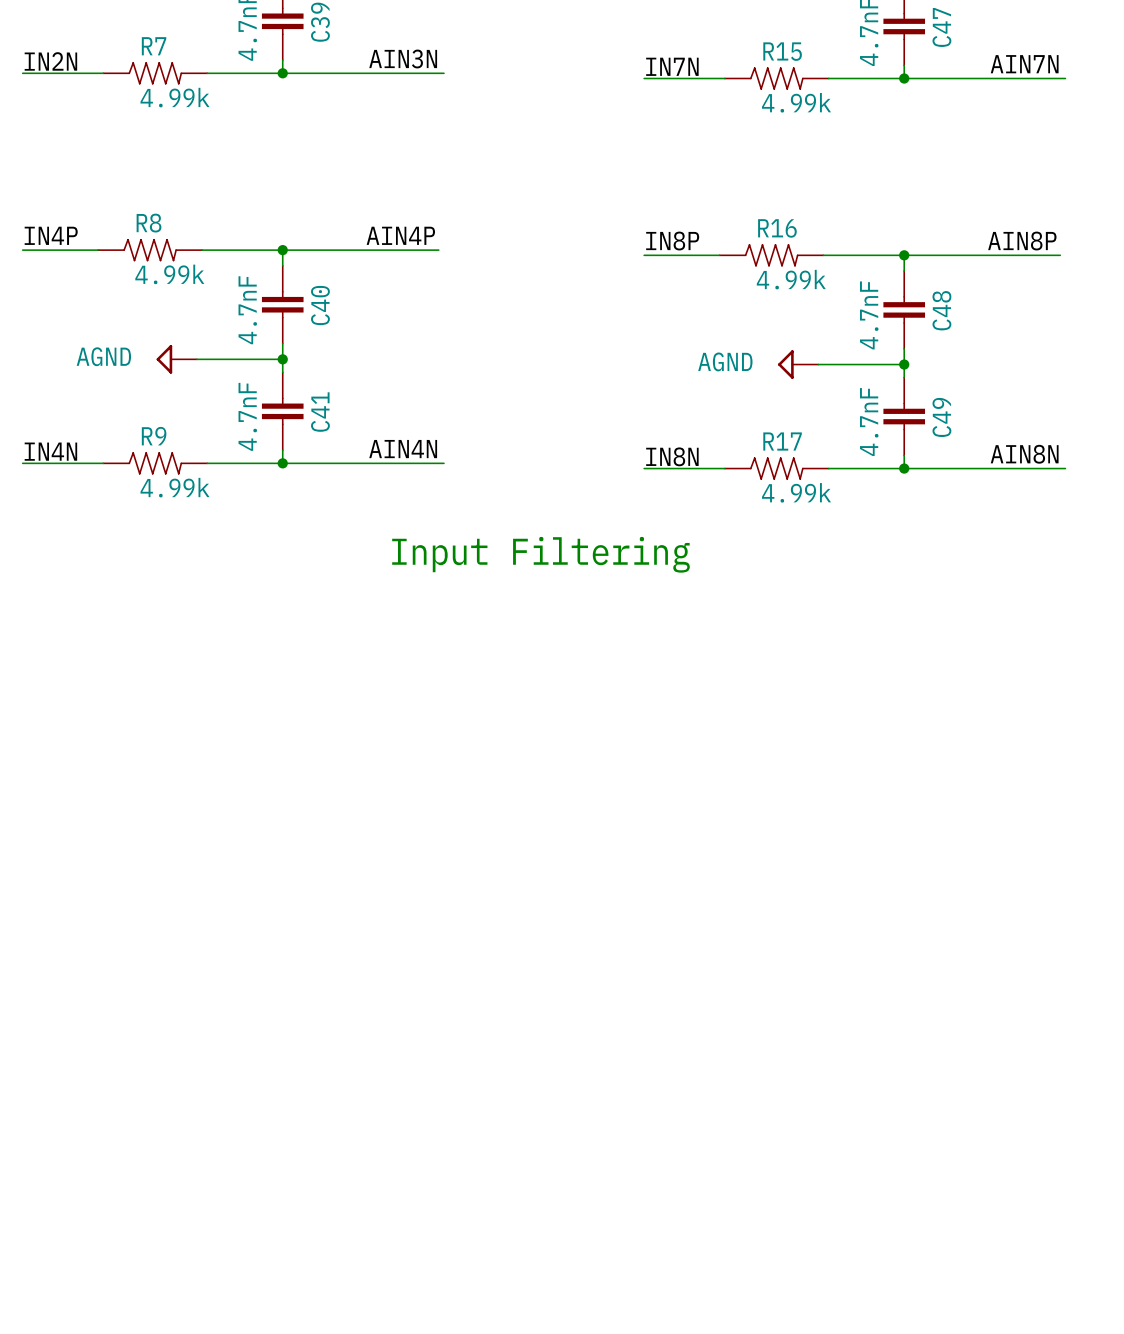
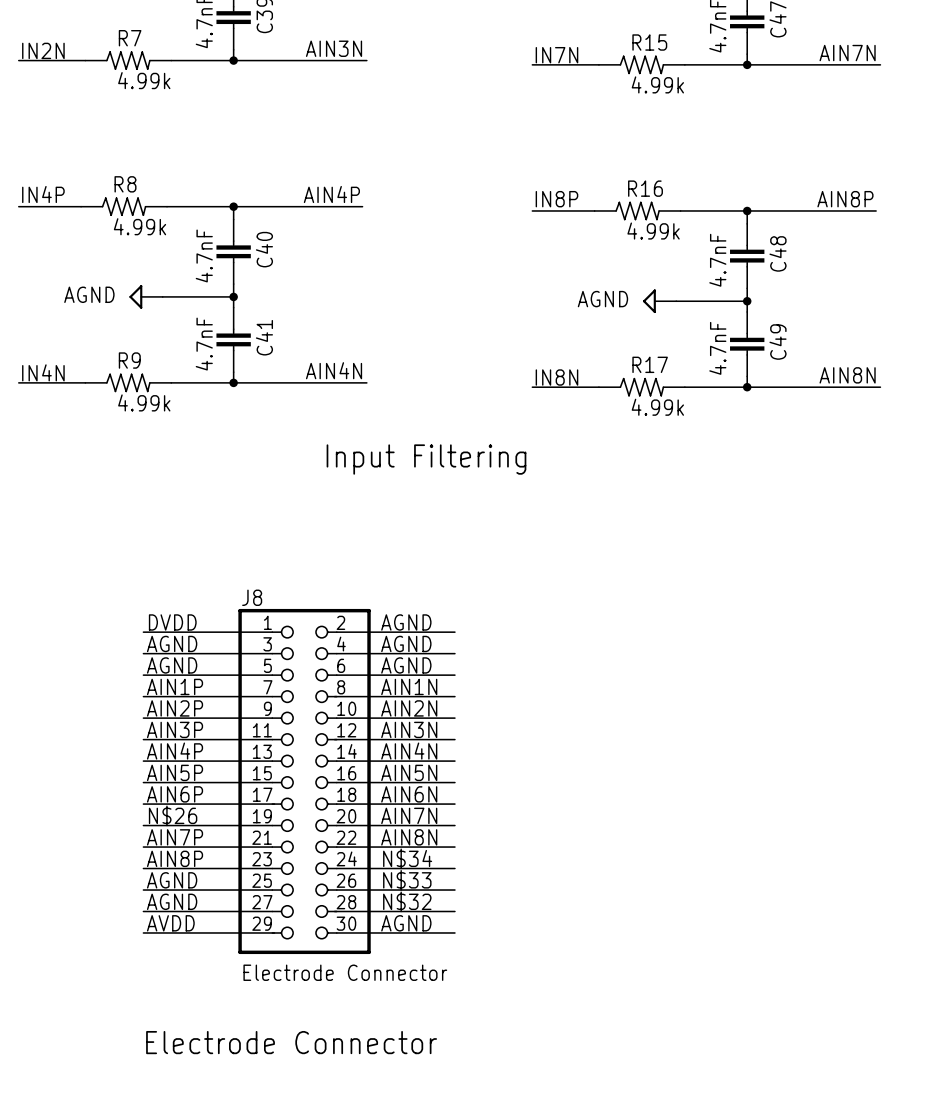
label: none -> DVDD (172, 622)
label: none -> AGND (406, 622)
wire: none -> (143, 632) (272, 632)
wire: none -> (336, 632) (454, 632)
label: none -> AGND (172, 643)
label: none -> AGND (406, 643)
wire: none -> (143, 653) (272, 653)
wire: none -> (336, 653) (454, 653)
label: none -> AGND (172, 665)
label: none -> AGND (406, 665)
wire: none -> (143, 675) (272, 675)
wire: none -> (336, 675) (454, 675)
label: none -> AIN1P (175, 686)
label: none -> AIN1N (409, 686)
wire: none -> (143, 696) (272, 696)
wire: none -> (334, 696) (454, 696)
label: none -> AIN2P (175, 708)
label: none -> AIN2N (409, 708)
wire: none -> (143, 718) (272, 718)
wire: none -> (336, 718) (454, 718)
label: none -> AIN3P (175, 729)
label: none -> AIN3N (409, 729)
wire: none -> (143, 739) (272, 739)
wire: none -> (334, 739) (454, 739)
label: none -> AIN4P (175, 751)
label: none -> AIN4N (409, 751)
wire: none -> (143, 761) (272, 761)
wire: none -> (336, 761) (454, 761)
label: none -> AIN5P (175, 772)
label: none -> AIN5N (409, 772)
J8: none -> Electrode Connector (304, 781)
wire: none -> (143, 782) (272, 782)
wire: none -> (336, 782) (454, 782)
label: none -> AIN6P (175, 794)
label: none -> AIN6N (409, 794)
wire: none -> (143, 804) (274, 804)
wire: none -> (336, 804) (454, 804)
label: none -> N$26 (173, 815)
label: none -> AIN7N (409, 815)
wire: none -> (143, 825) (272, 825)
wire: none -> (336, 825) (454, 825)
label: none -> AIN7P (175, 837)
label: none -> AIN8N (409, 837)
wire: none -> (143, 847) (272, 847)
wire: none -> (336, 847) (454, 847)
label: none -> AIN8P (175, 858)
label: none -> N$34 (407, 858)
wire: none -> (143, 868) (272, 868)
wire: none -> (336, 868) (454, 868)
label: none -> AGND (172, 880)
label: none -> N$33 (407, 880)
wire: none -> (143, 890) (272, 890)
wire: none -> (336, 890) (454, 890)
label: none -> AGND (172, 901)
label: none -> N$32 (407, 901)
wire: none -> (143, 911) (272, 911)
wire: none -> (334, 911) (454, 911)
label: none -> AVDD (170, 923)
label: none -> AGND (406, 923)
wire: none -> (143, 932) (274, 932)
wire: none -> (336, 932) (454, 932)
text: none -> Electrode Connector (291, 1042)

